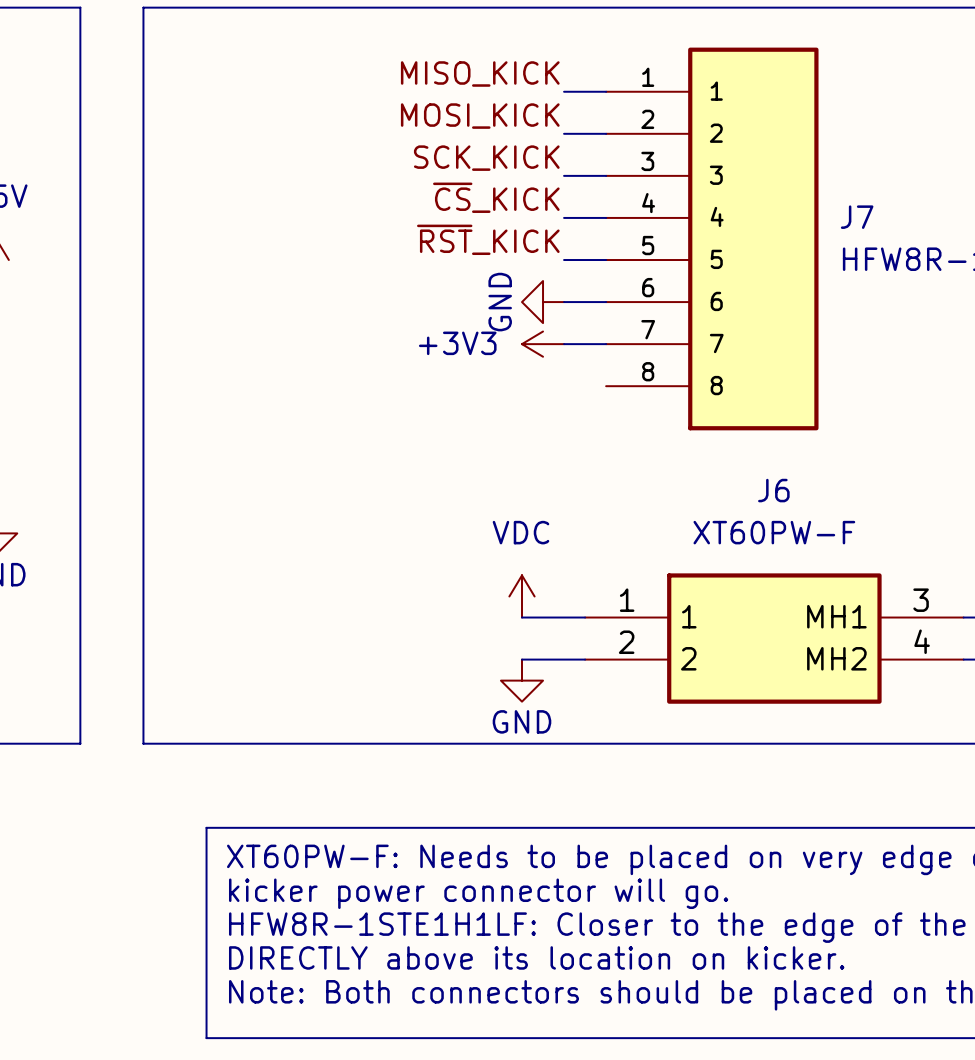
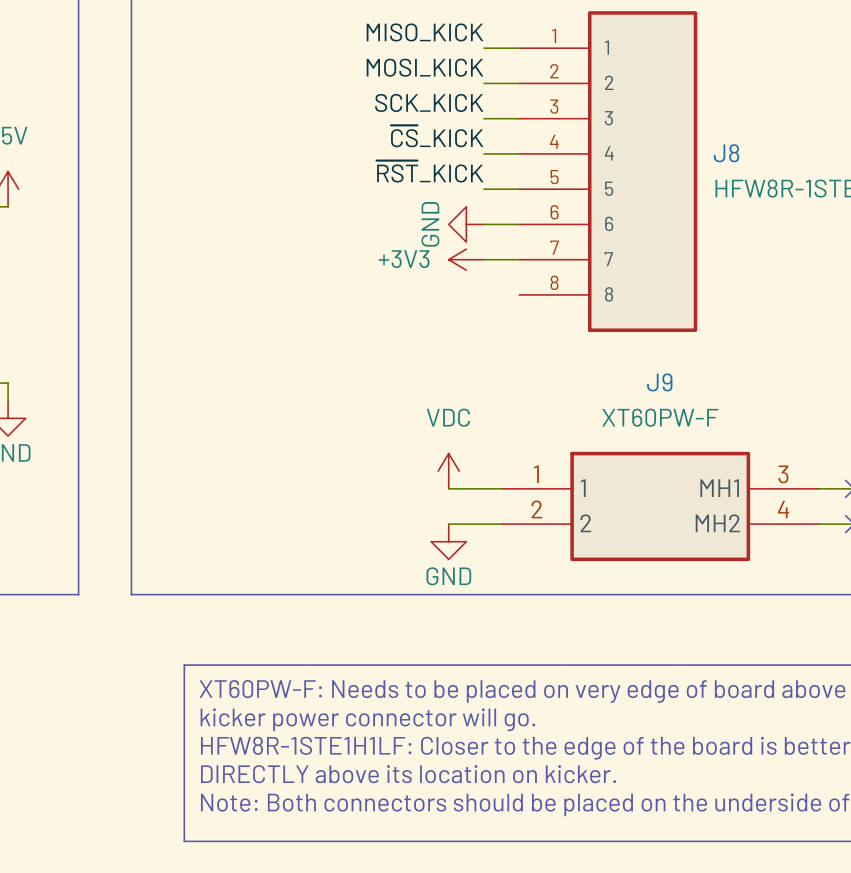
J7 name: J7 (857, 217) -> J8 (726, 153)
J6 name: J6 (773, 490) -> J9 (659, 382)

